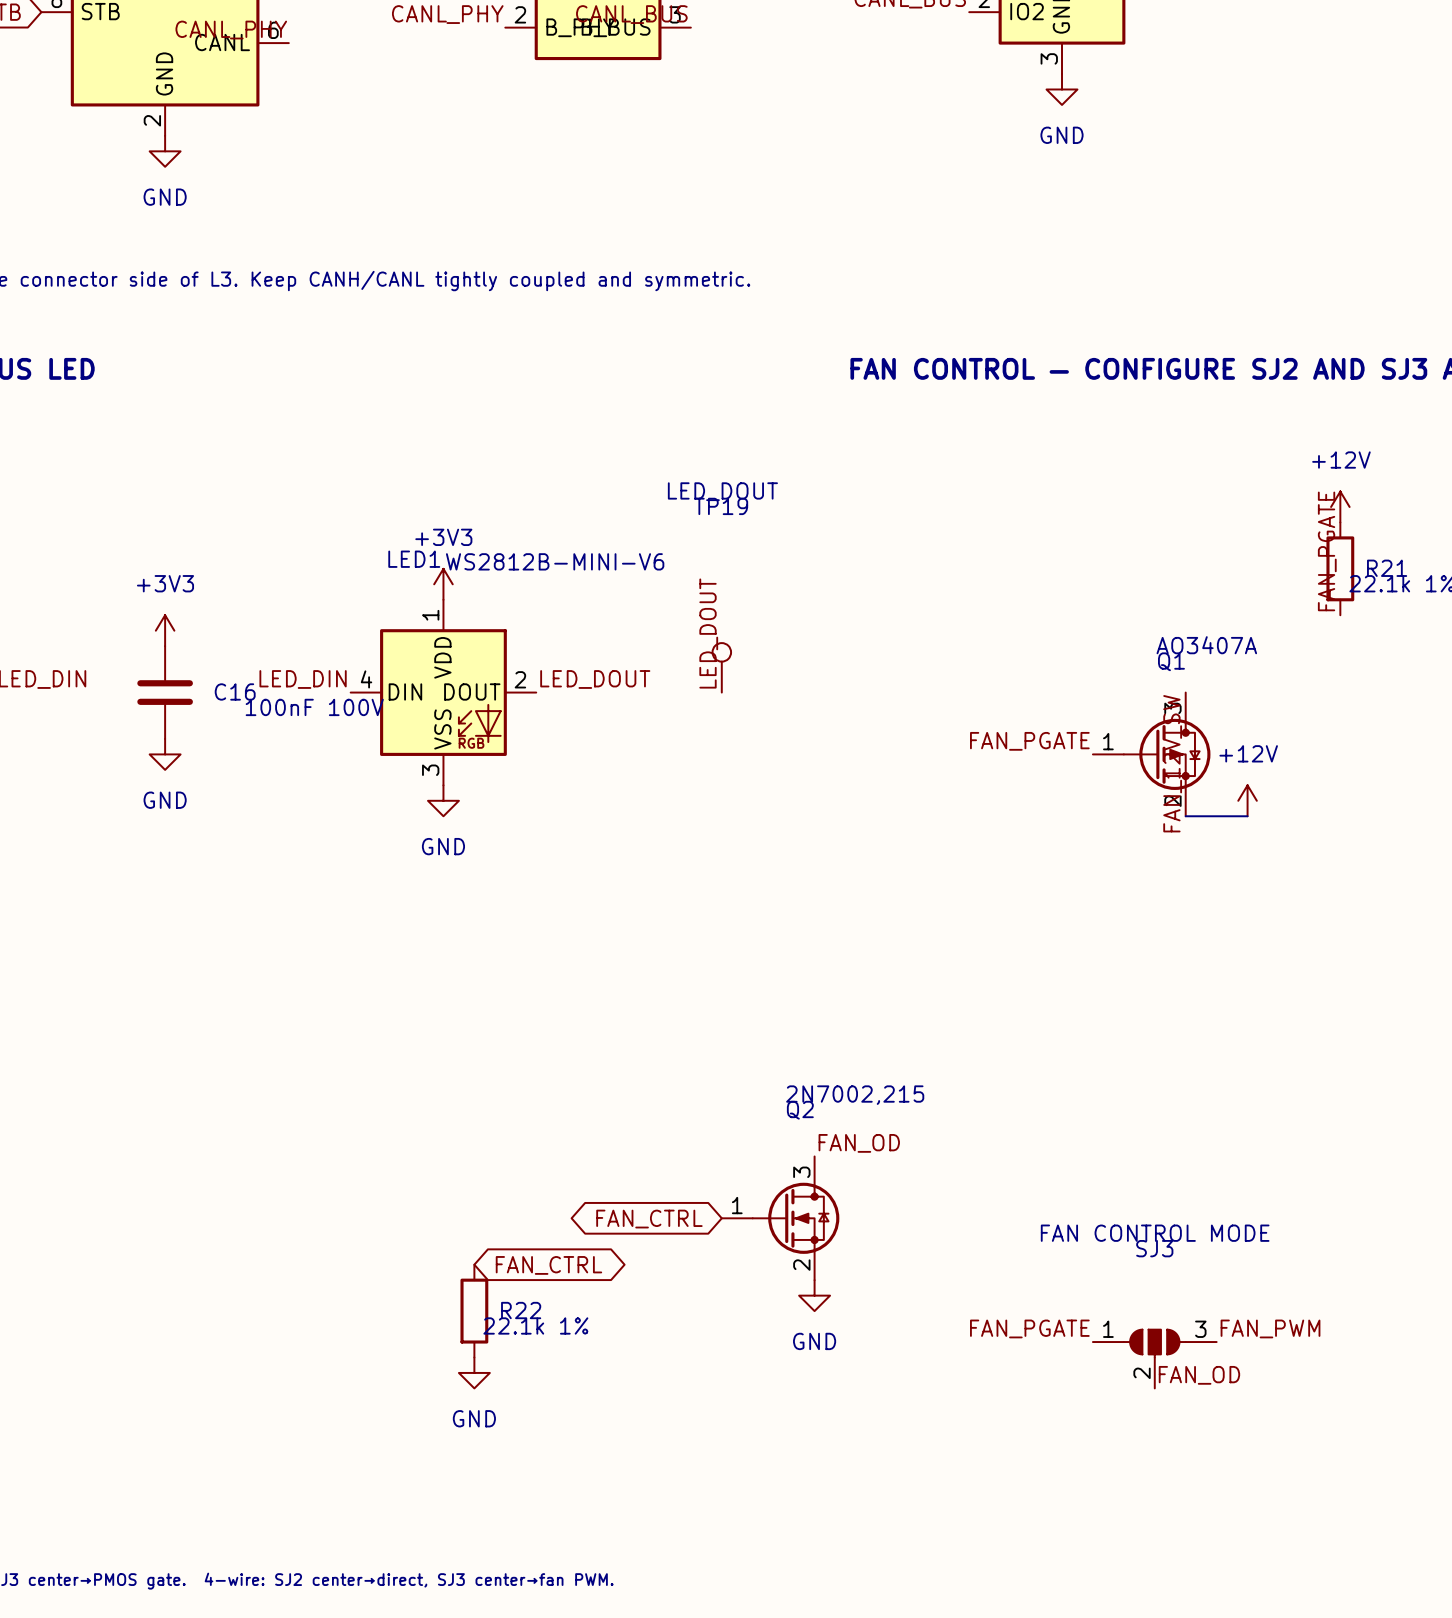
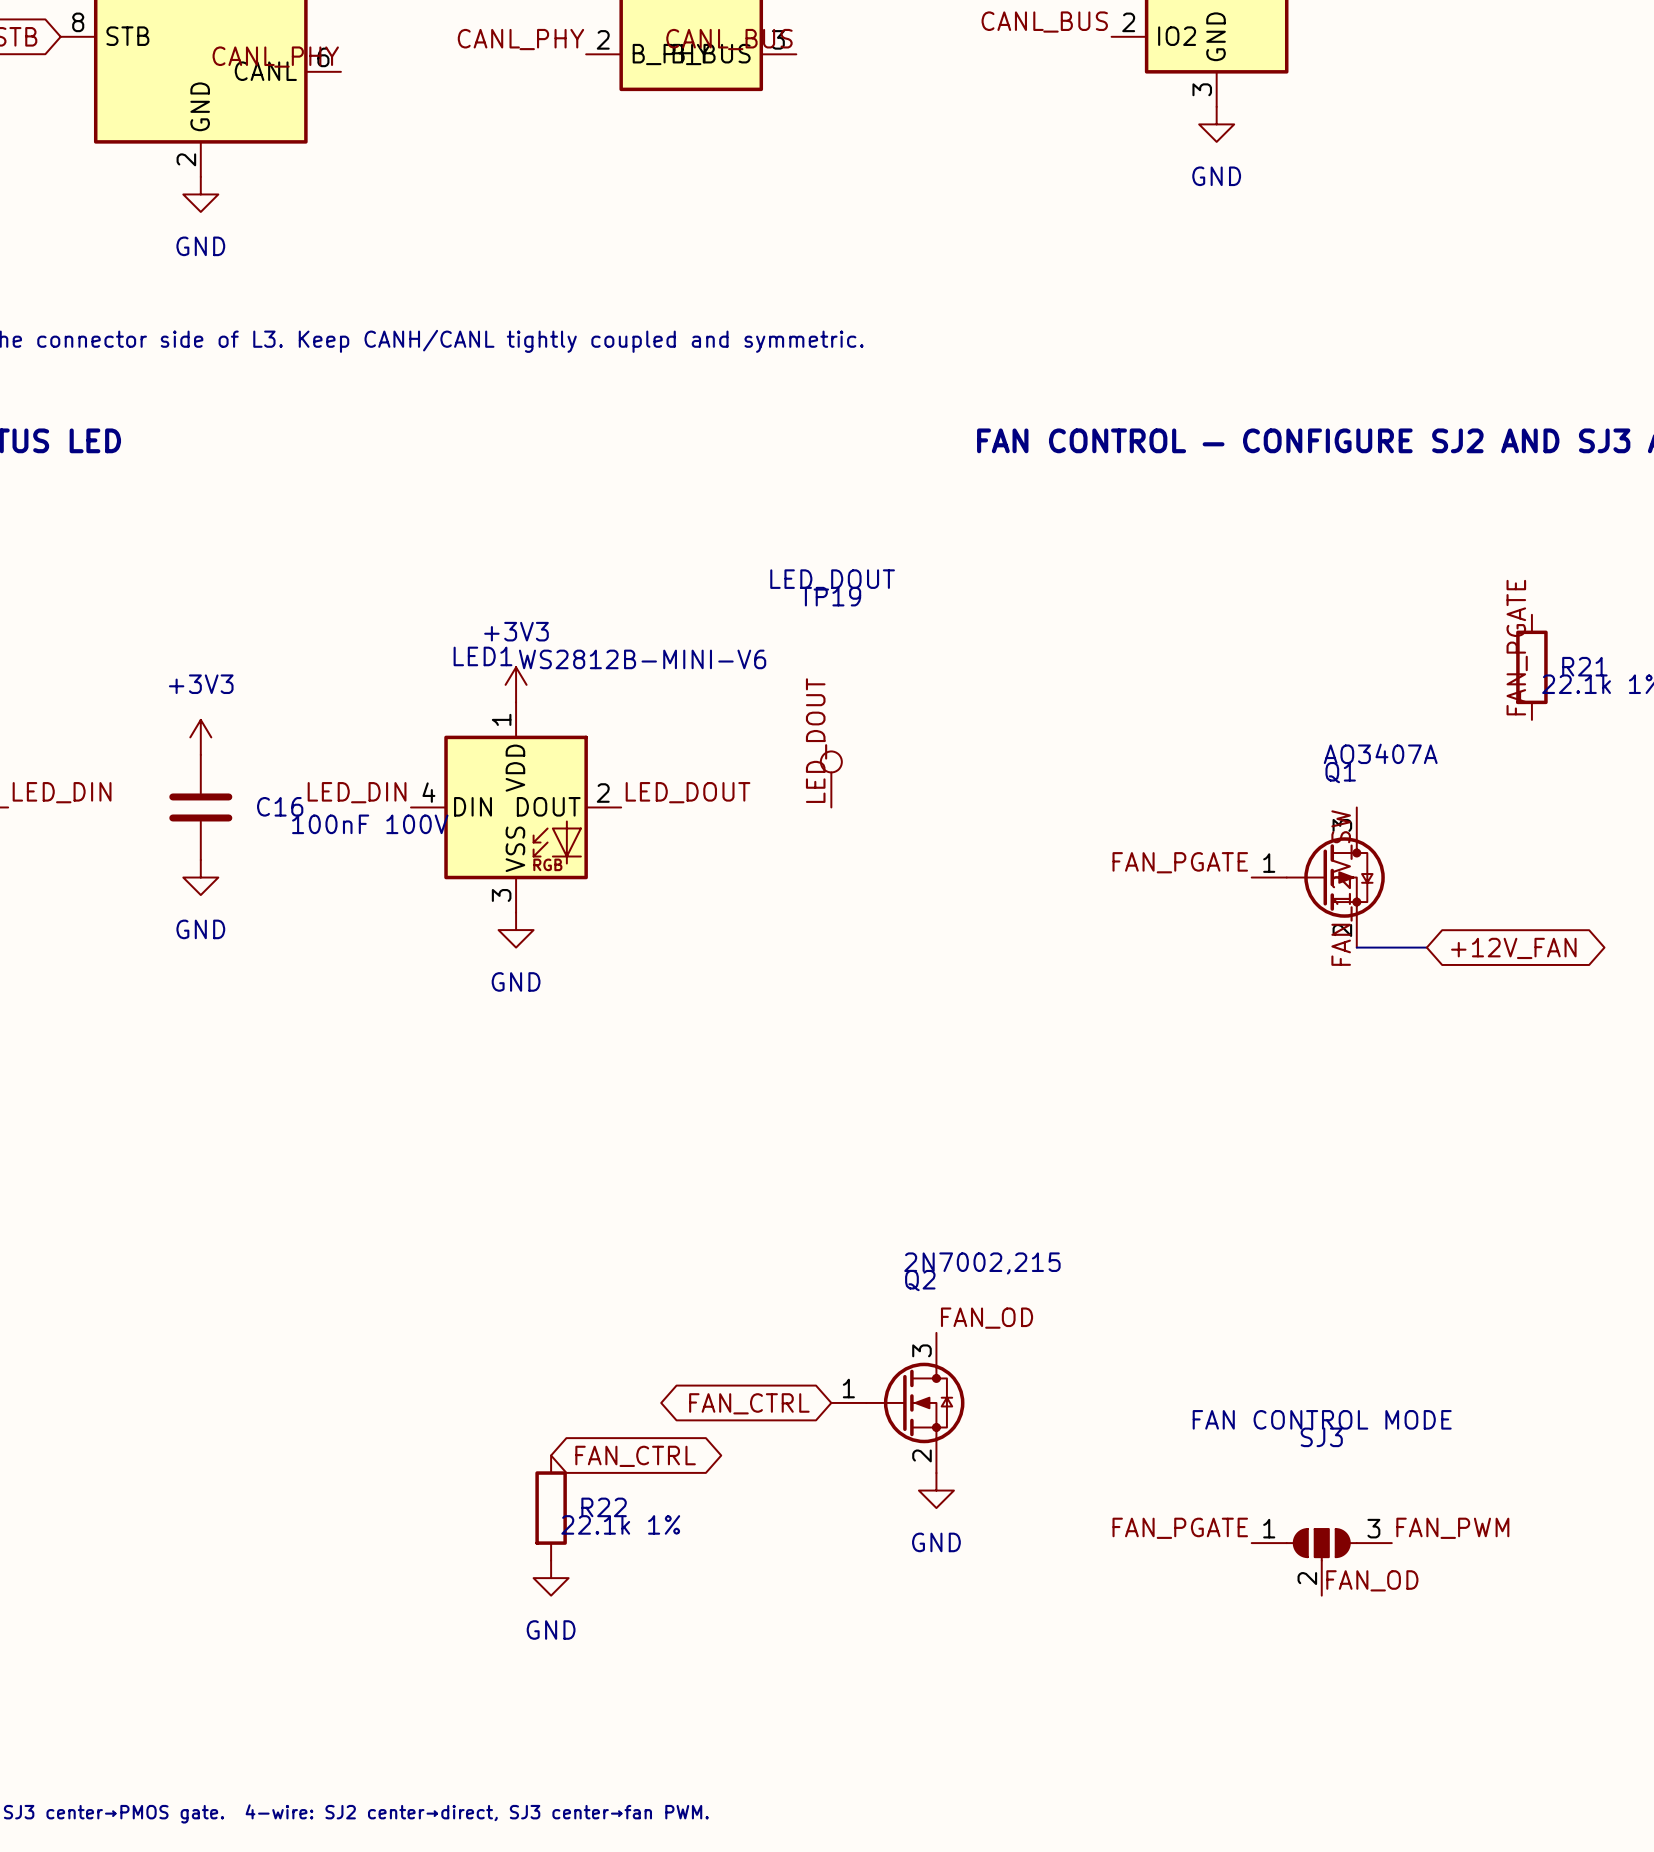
power symbol: +12V (1340, 506) -> none
power symbol: +12V (1247, 800) -> none
global label: none -> +12V_FAN (1513, 948)

